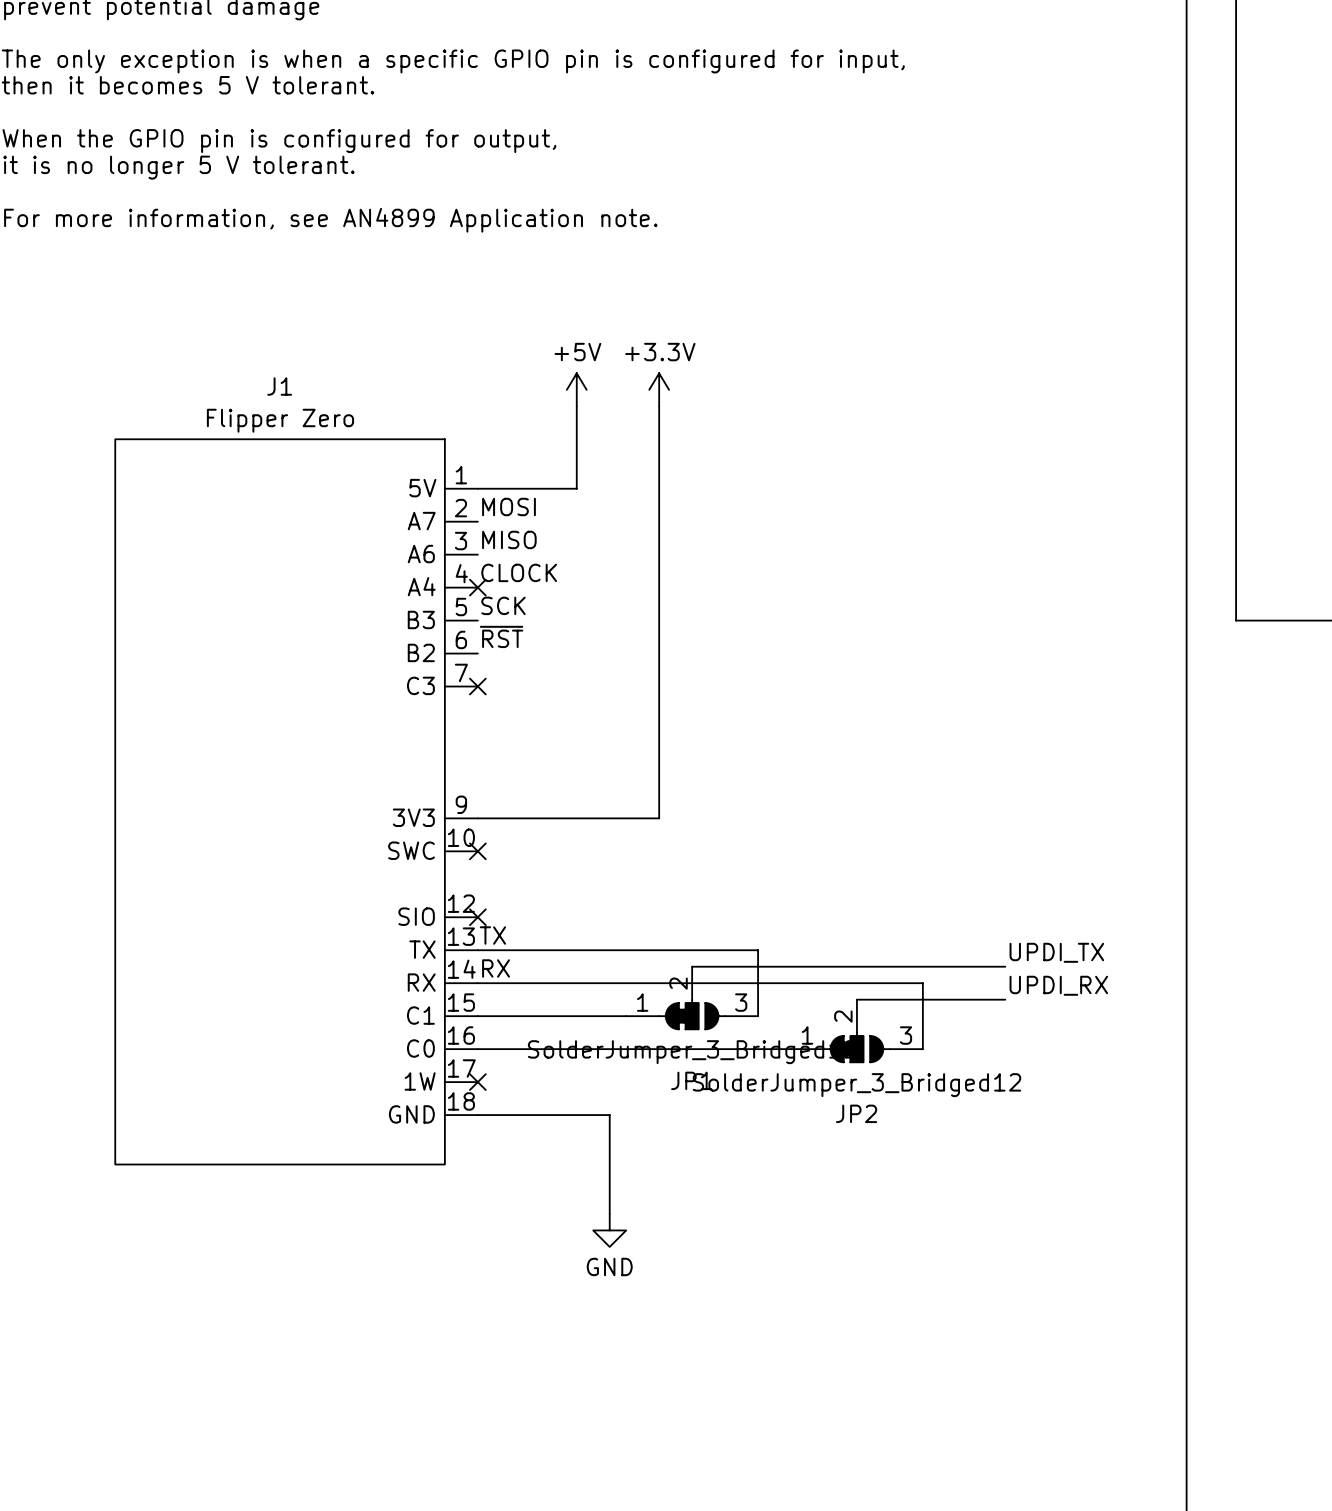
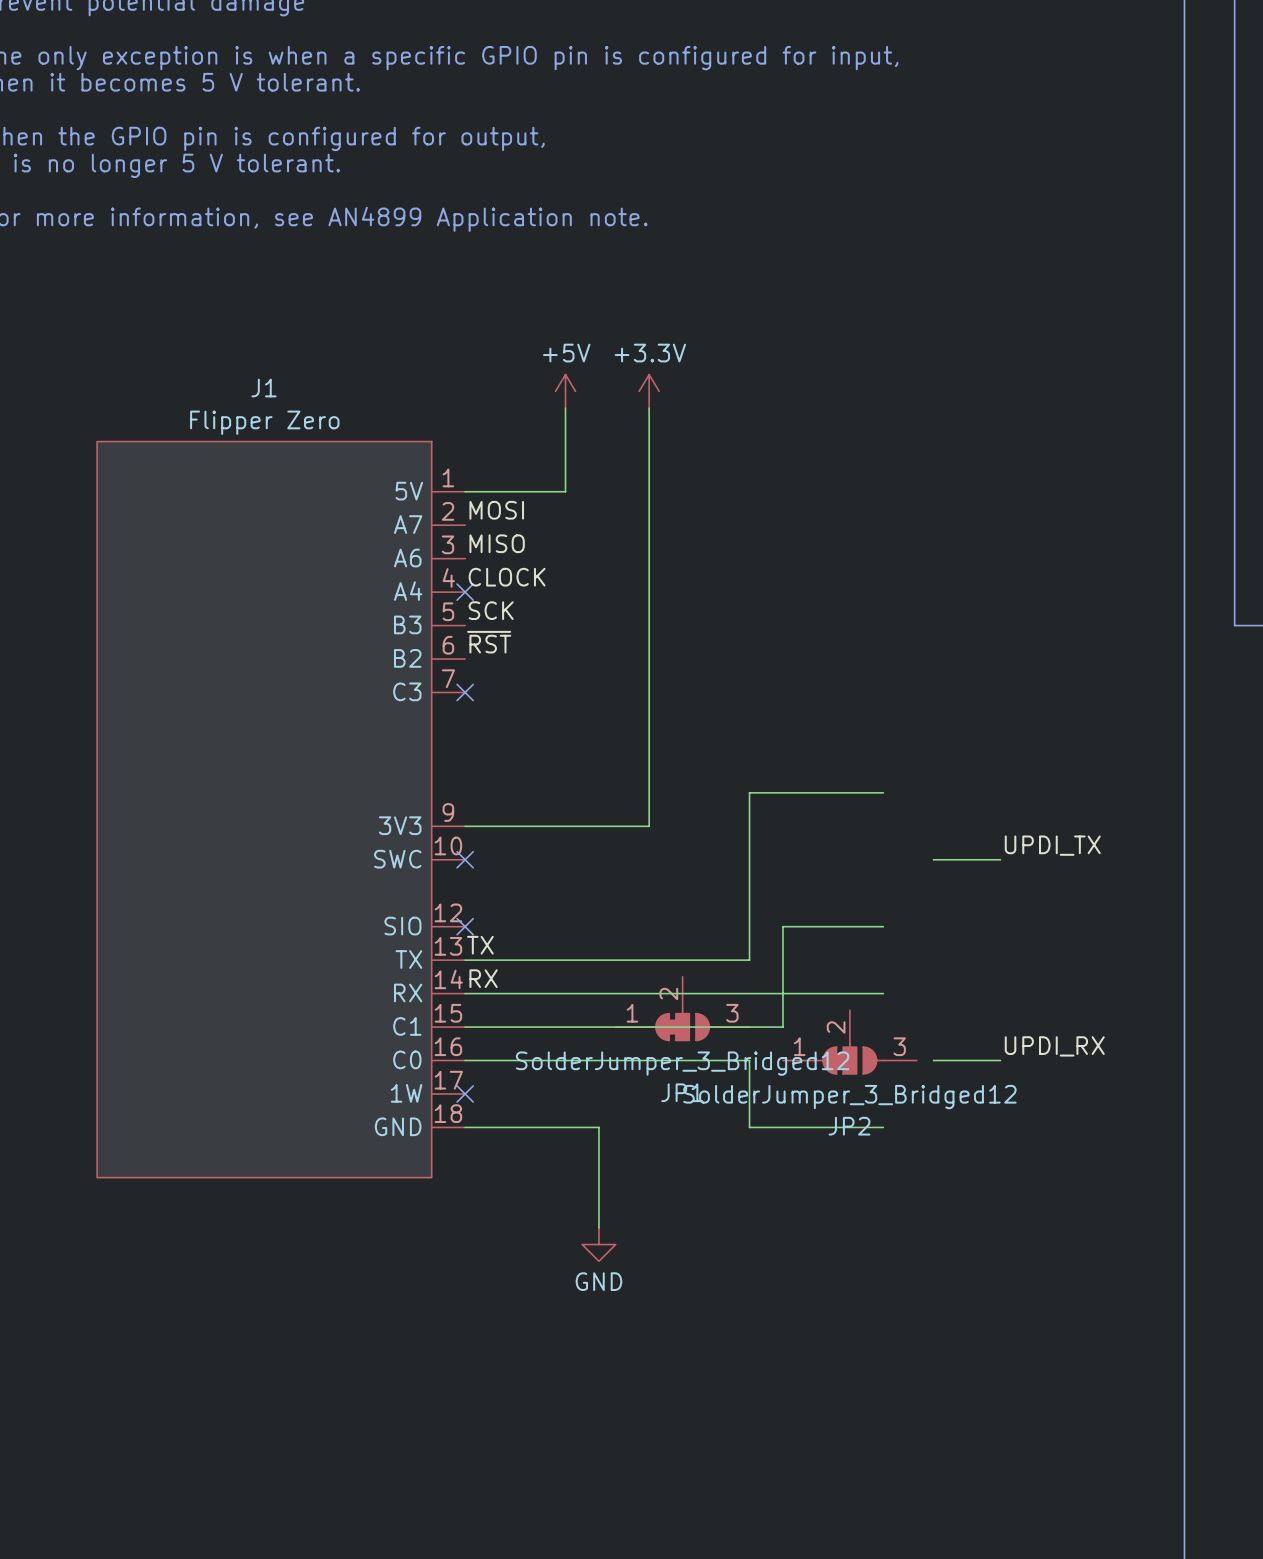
wire: none -> (933, 859) (1000, 859)
wire: none -> (883, 926) (782, 926) (782, 1027) (615, 1027)
wire: (758, 950) (758, 1016) -> (749, 960) (749, 792) (883, 792)
label position: UPDI_TX (1056, 952) -> UPDI_TX (1052, 845)
wire: (692, 966) (1005, 966) -> none
wire: (889, 983) (922, 983) (922, 1049) -> none
label position: UPDI_RX (1058, 985) -> UPDI_RX (1054, 1046)
wire: (856, 999) (1005, 999) -> none
wire: (758, 1049) (791, 1049) -> (749, 1060) (749, 1127) (883, 1127)
wire: none -> (933, 1060) (1000, 1060)

